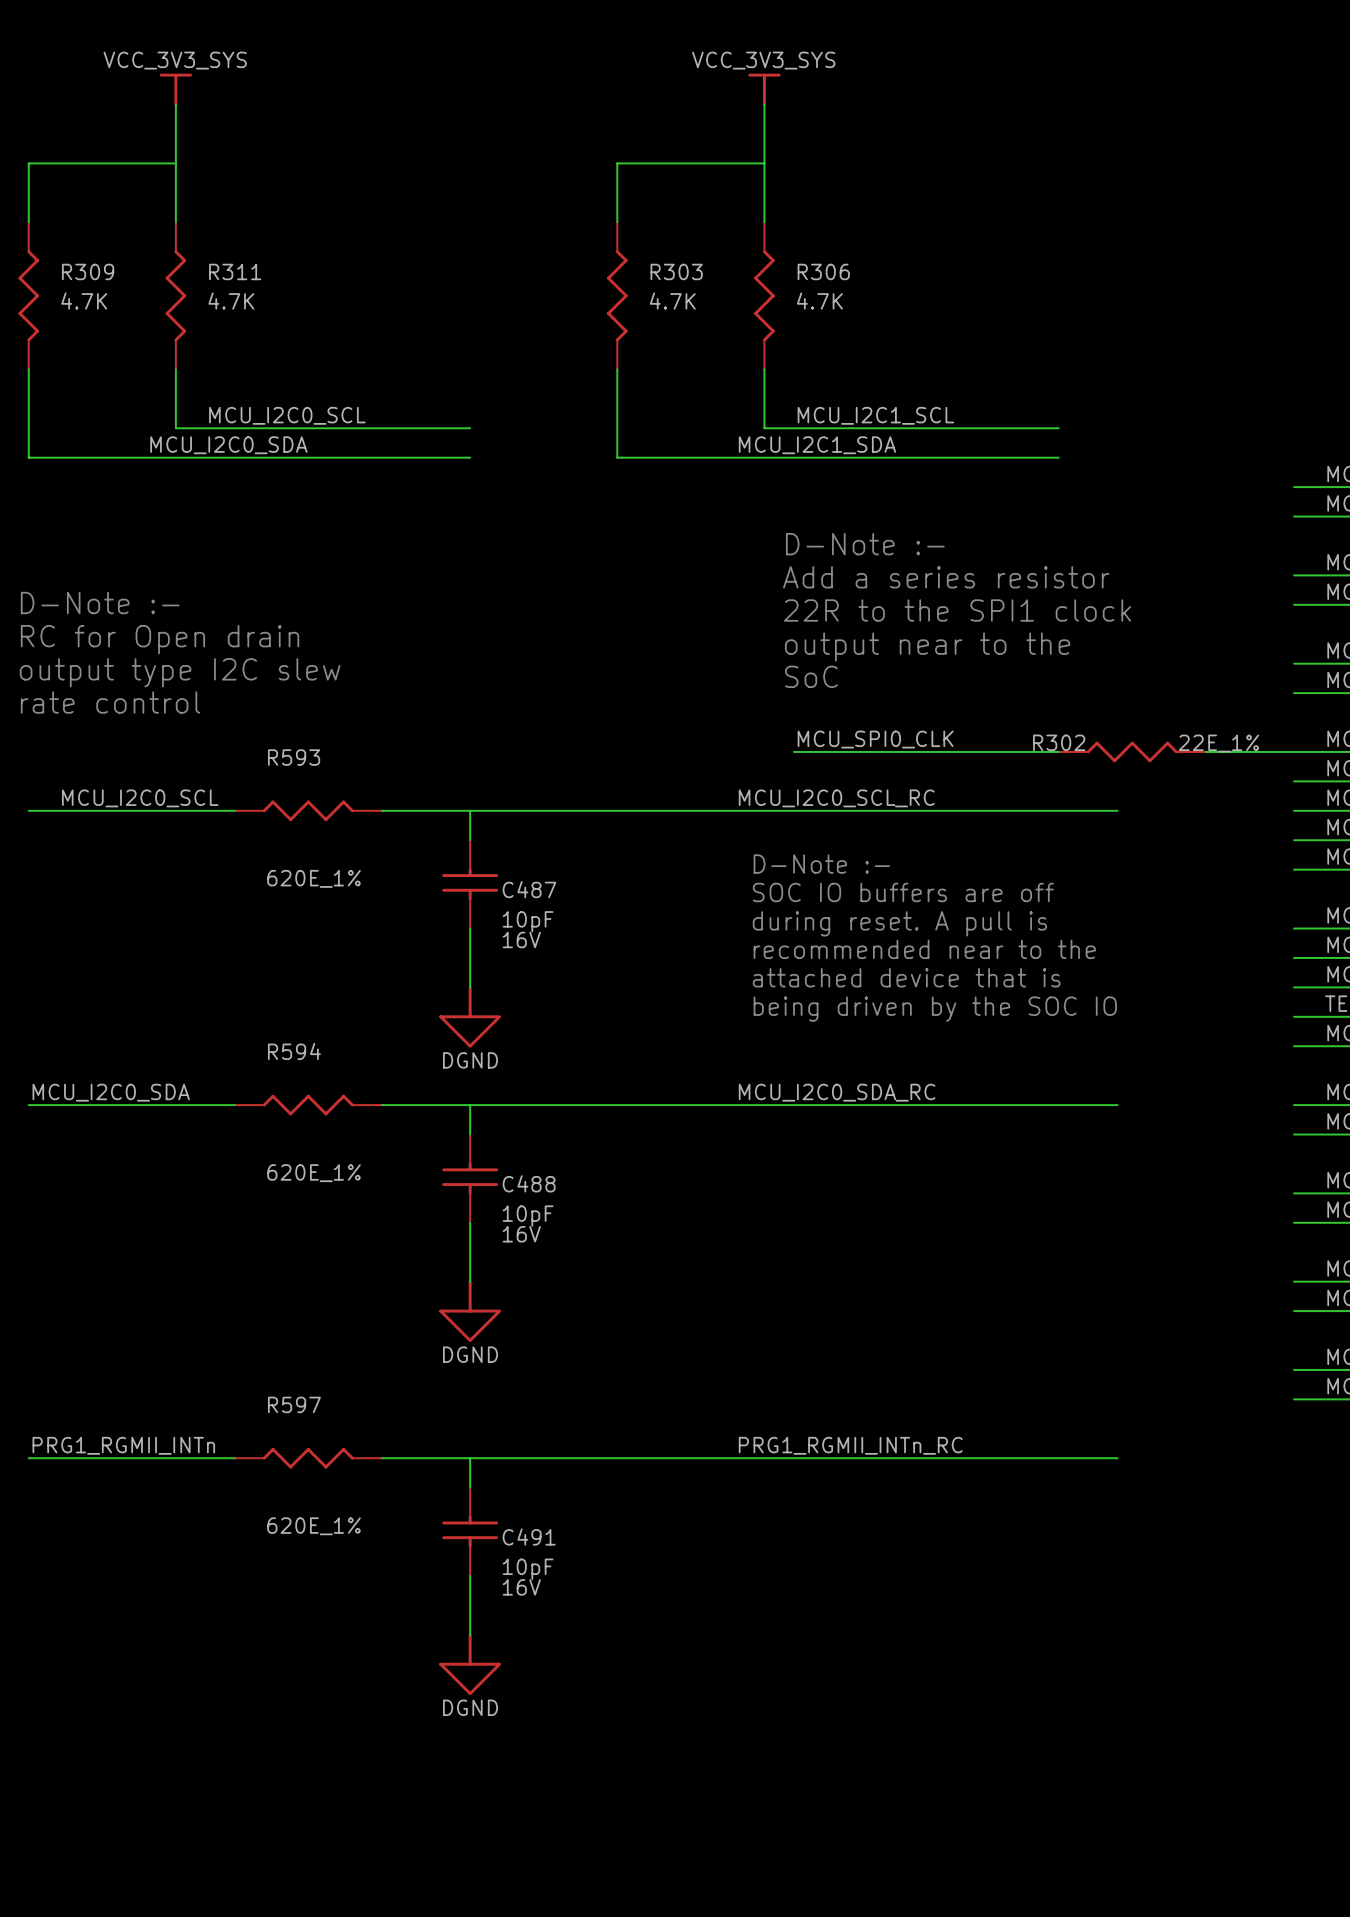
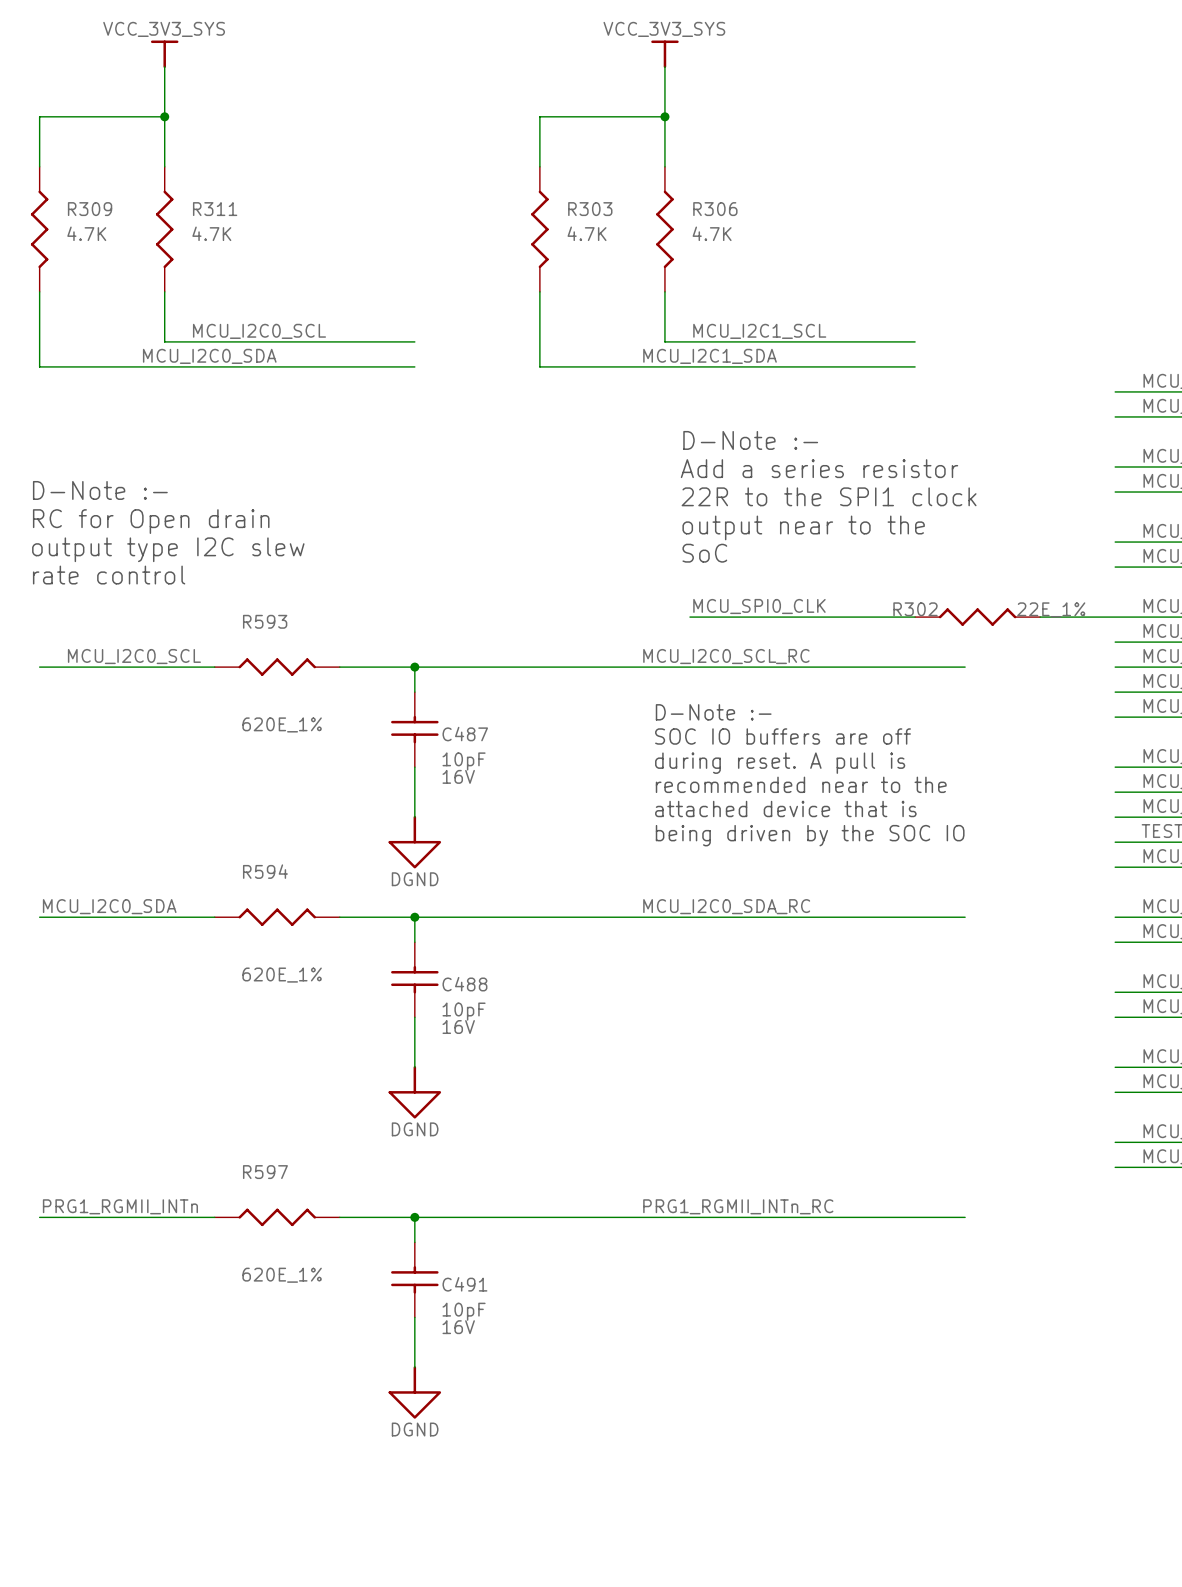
junction: none -> (164, 116)
junction: none -> (664, 116)
junction: none -> (414, 667)
junction: none -> (414, 917)
junction: none -> (414, 1217)

